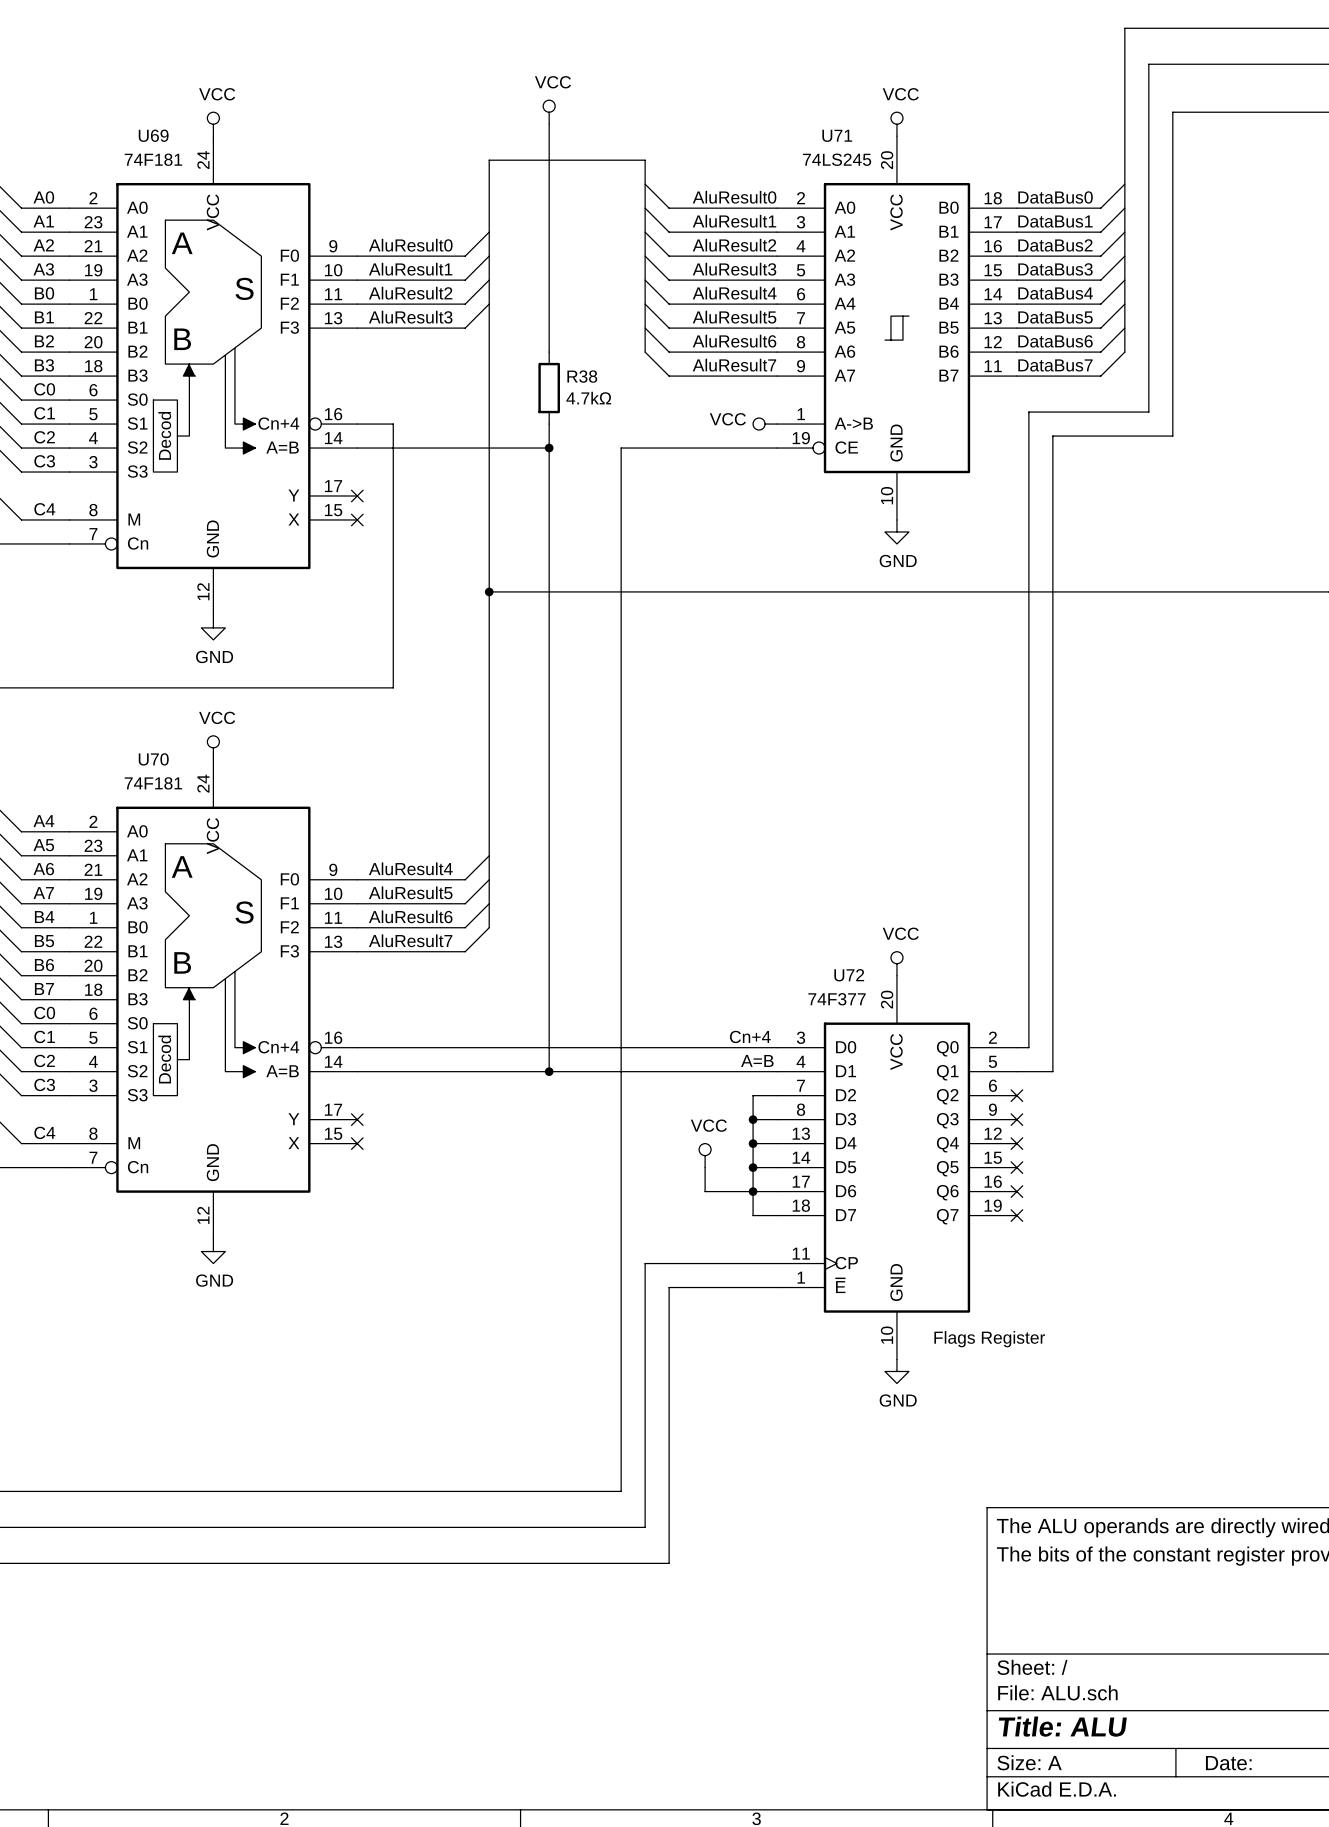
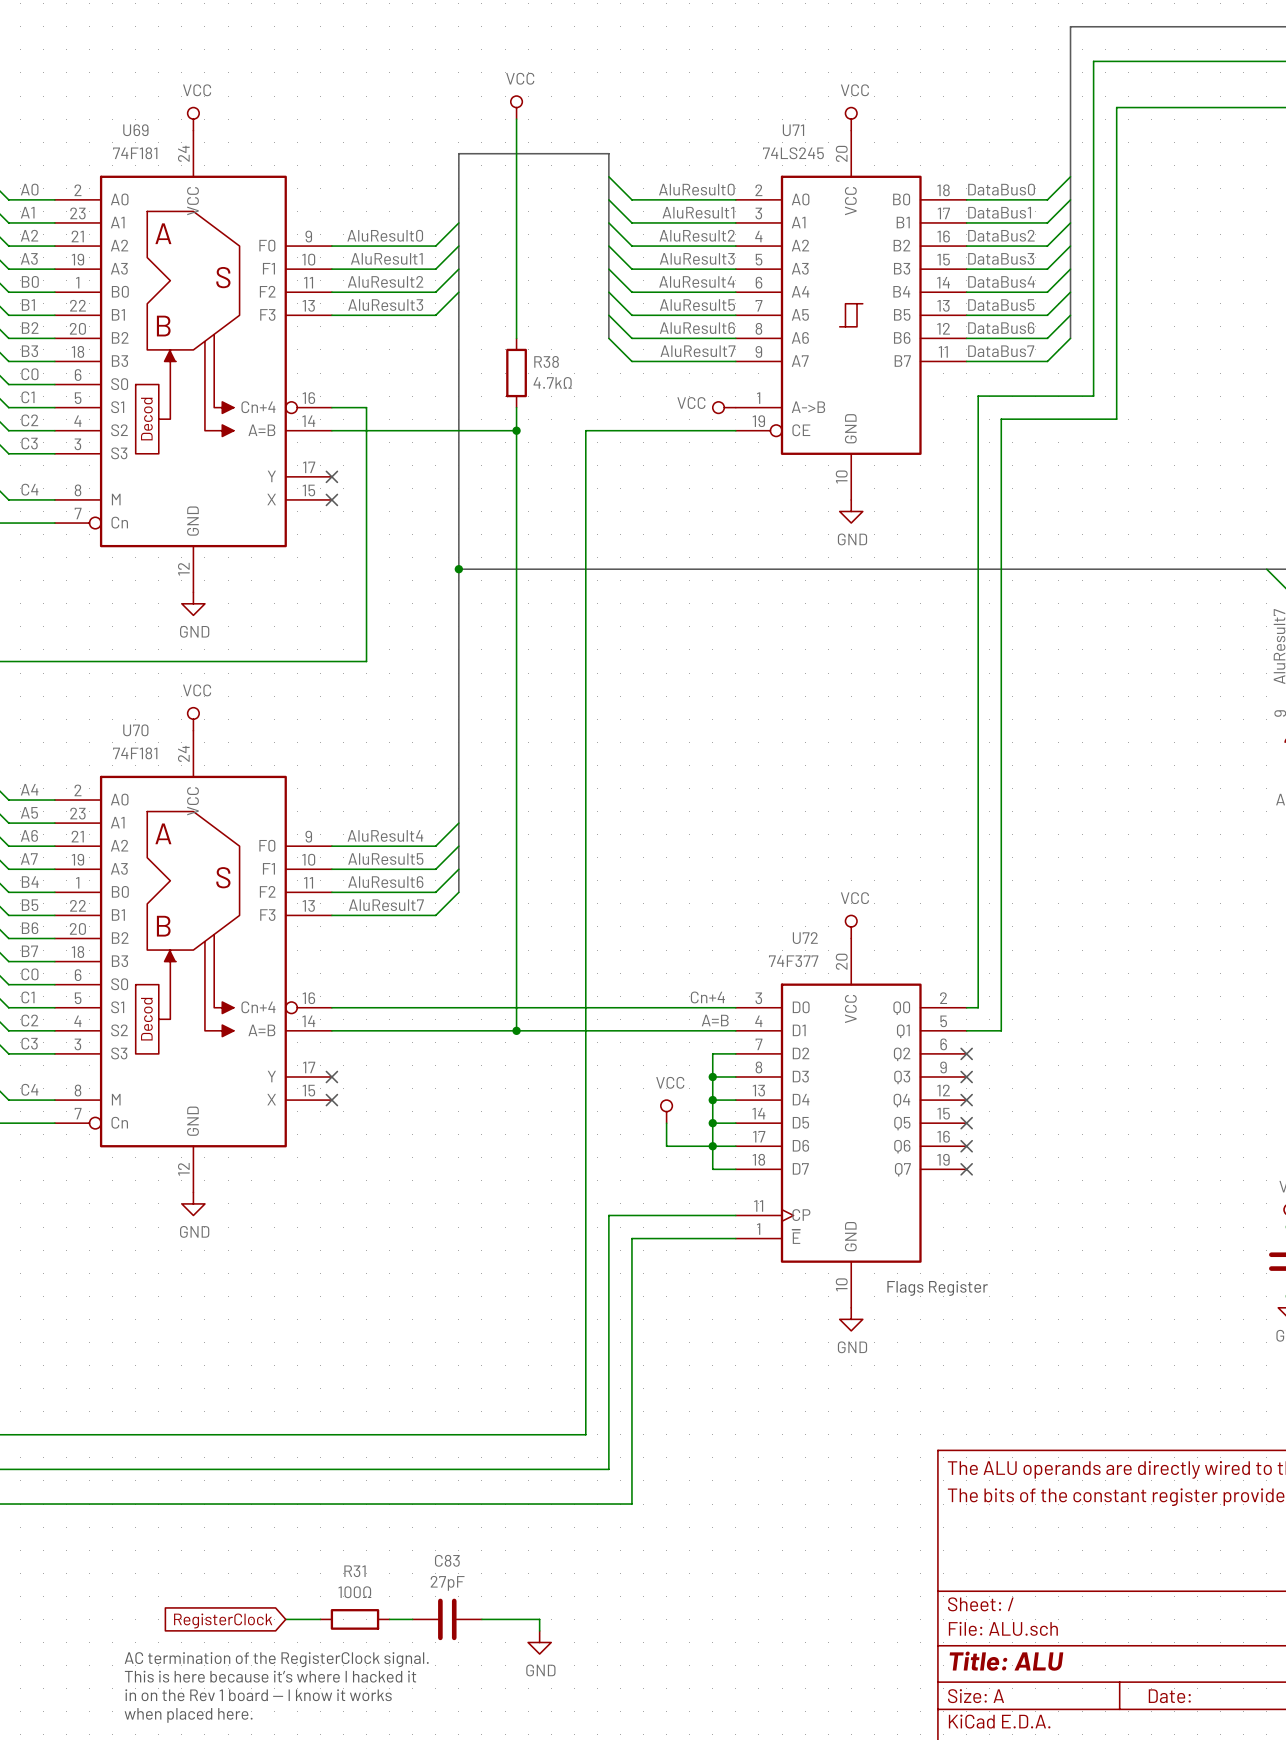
wire: none -> (285, 1619) (320, 1619)
R31: none -> 100Ω (354, 1619)
wire: none -> (389, 1619) (412, 1619)
C83: none -> 27pF (447, 1619)
wire: none -> (481, 1619) (539, 1619) (539, 1630)
global label: none -> RegisterClock (223, 1620)
power symbol: none -> GND (539, 1642)
text: none -> AC termination of the RegisterClock signal. (276, 1659)
text: none -> This is here because it’s where I hacked it (270, 1676)
text: none -> in on the Rev 1 board — I know it works (258, 1695)
text: none -> when placed here. (188, 1715)

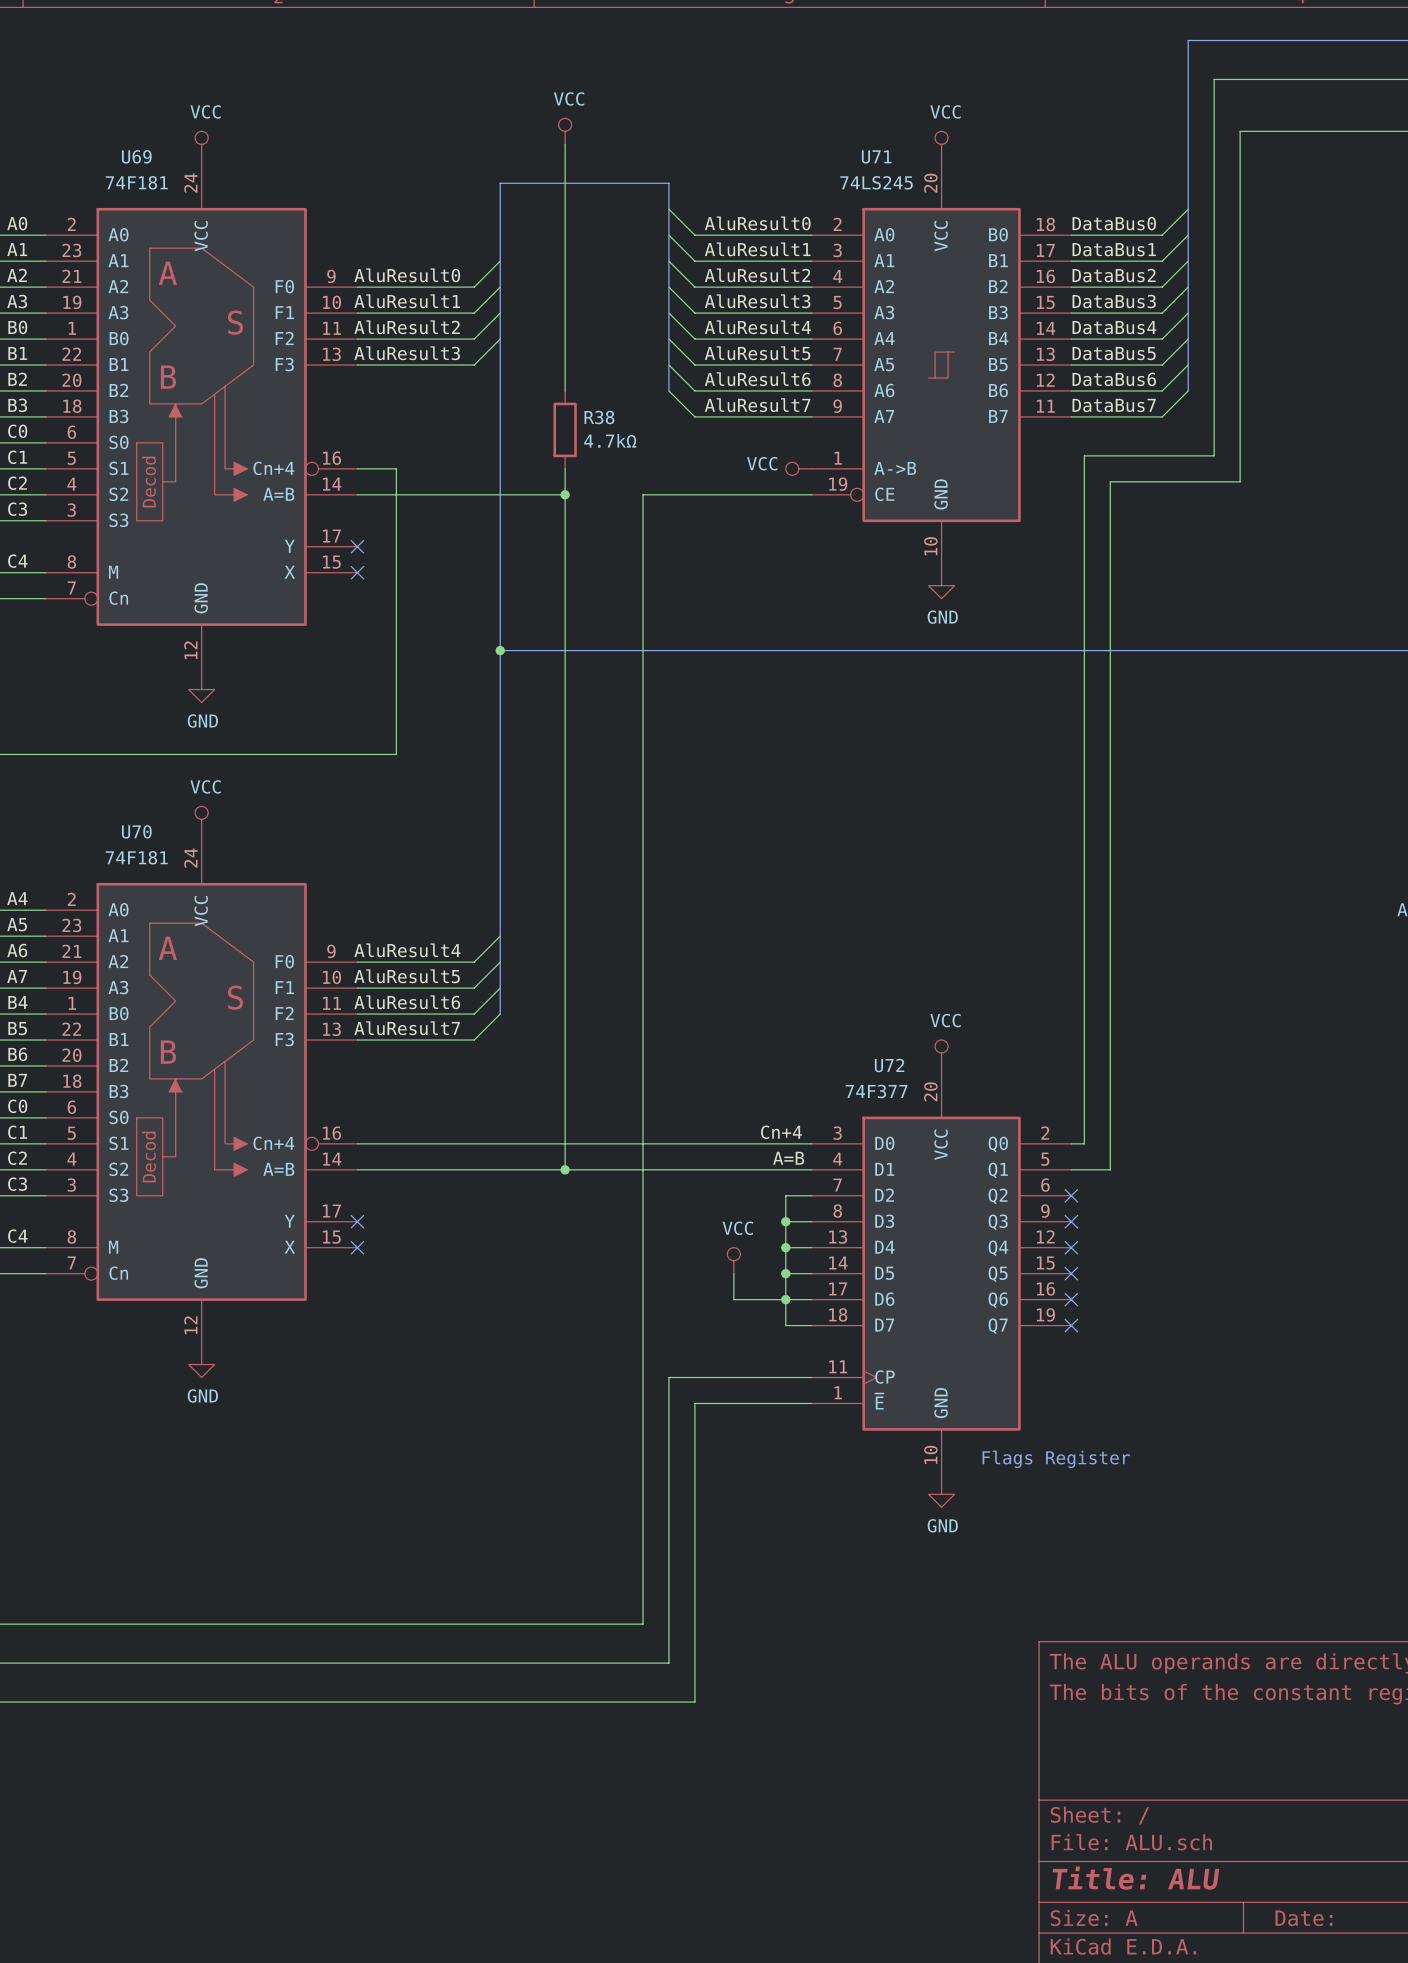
wire: (285, 1619) (320, 1619) -> none
R31: 100Ω (354, 1619) -> none
wire: (389, 1619) (412, 1619) -> none
C83: 27pF (447, 1619) -> none
wire: (481, 1619) (539, 1619) (539, 1630) -> none
global label: RegisterClock (223, 1620) -> none
power symbol: GND (539, 1642) -> none
text: AC termination of the RegisterClock signal. (276, 1659) -> none
text: This is here because it’s where I hacked it (270, 1676) -> none
text: in on the Rev 1 board — I know it works (258, 1695) -> none
text: when placed here. (188, 1715) -> none

